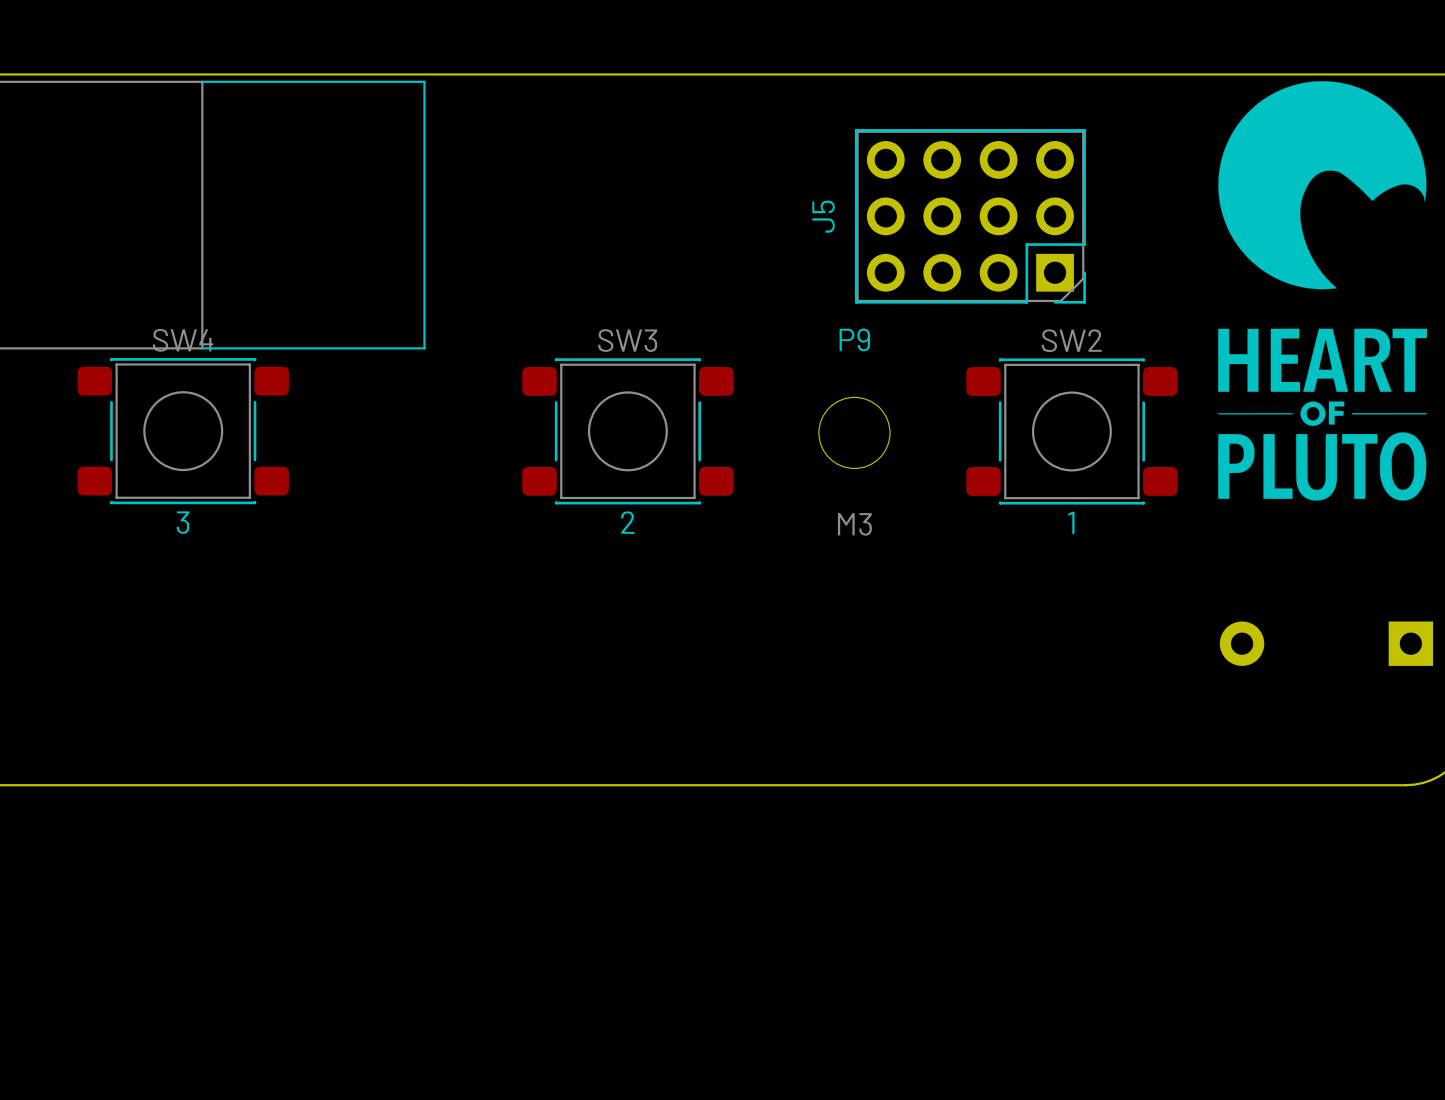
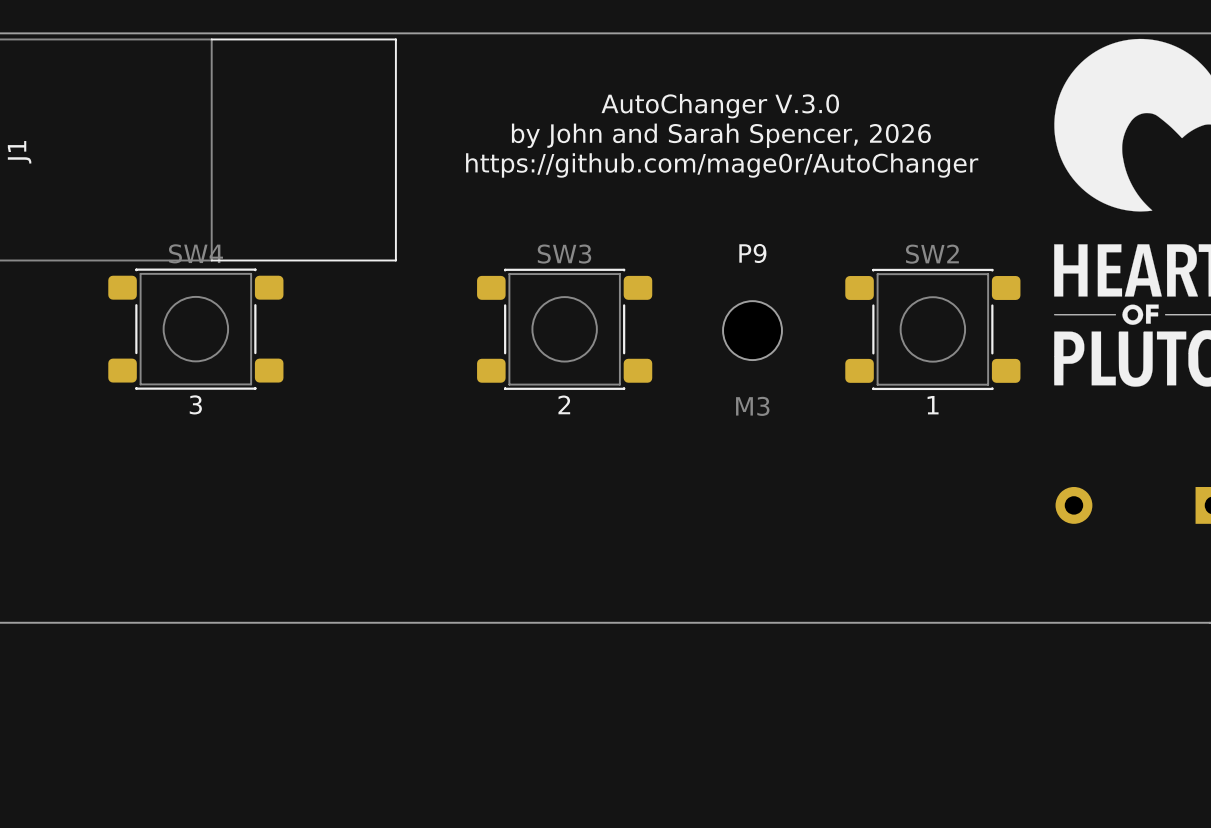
text: none -> AutoChanger V.3.0 (720, 106)
text: none -> by John and Sarah Spencer, 2026 (721, 135)
J5: (970, 216) -> none
text: none -> https://github.com/mage0r/AutoChanger (722, 165)

